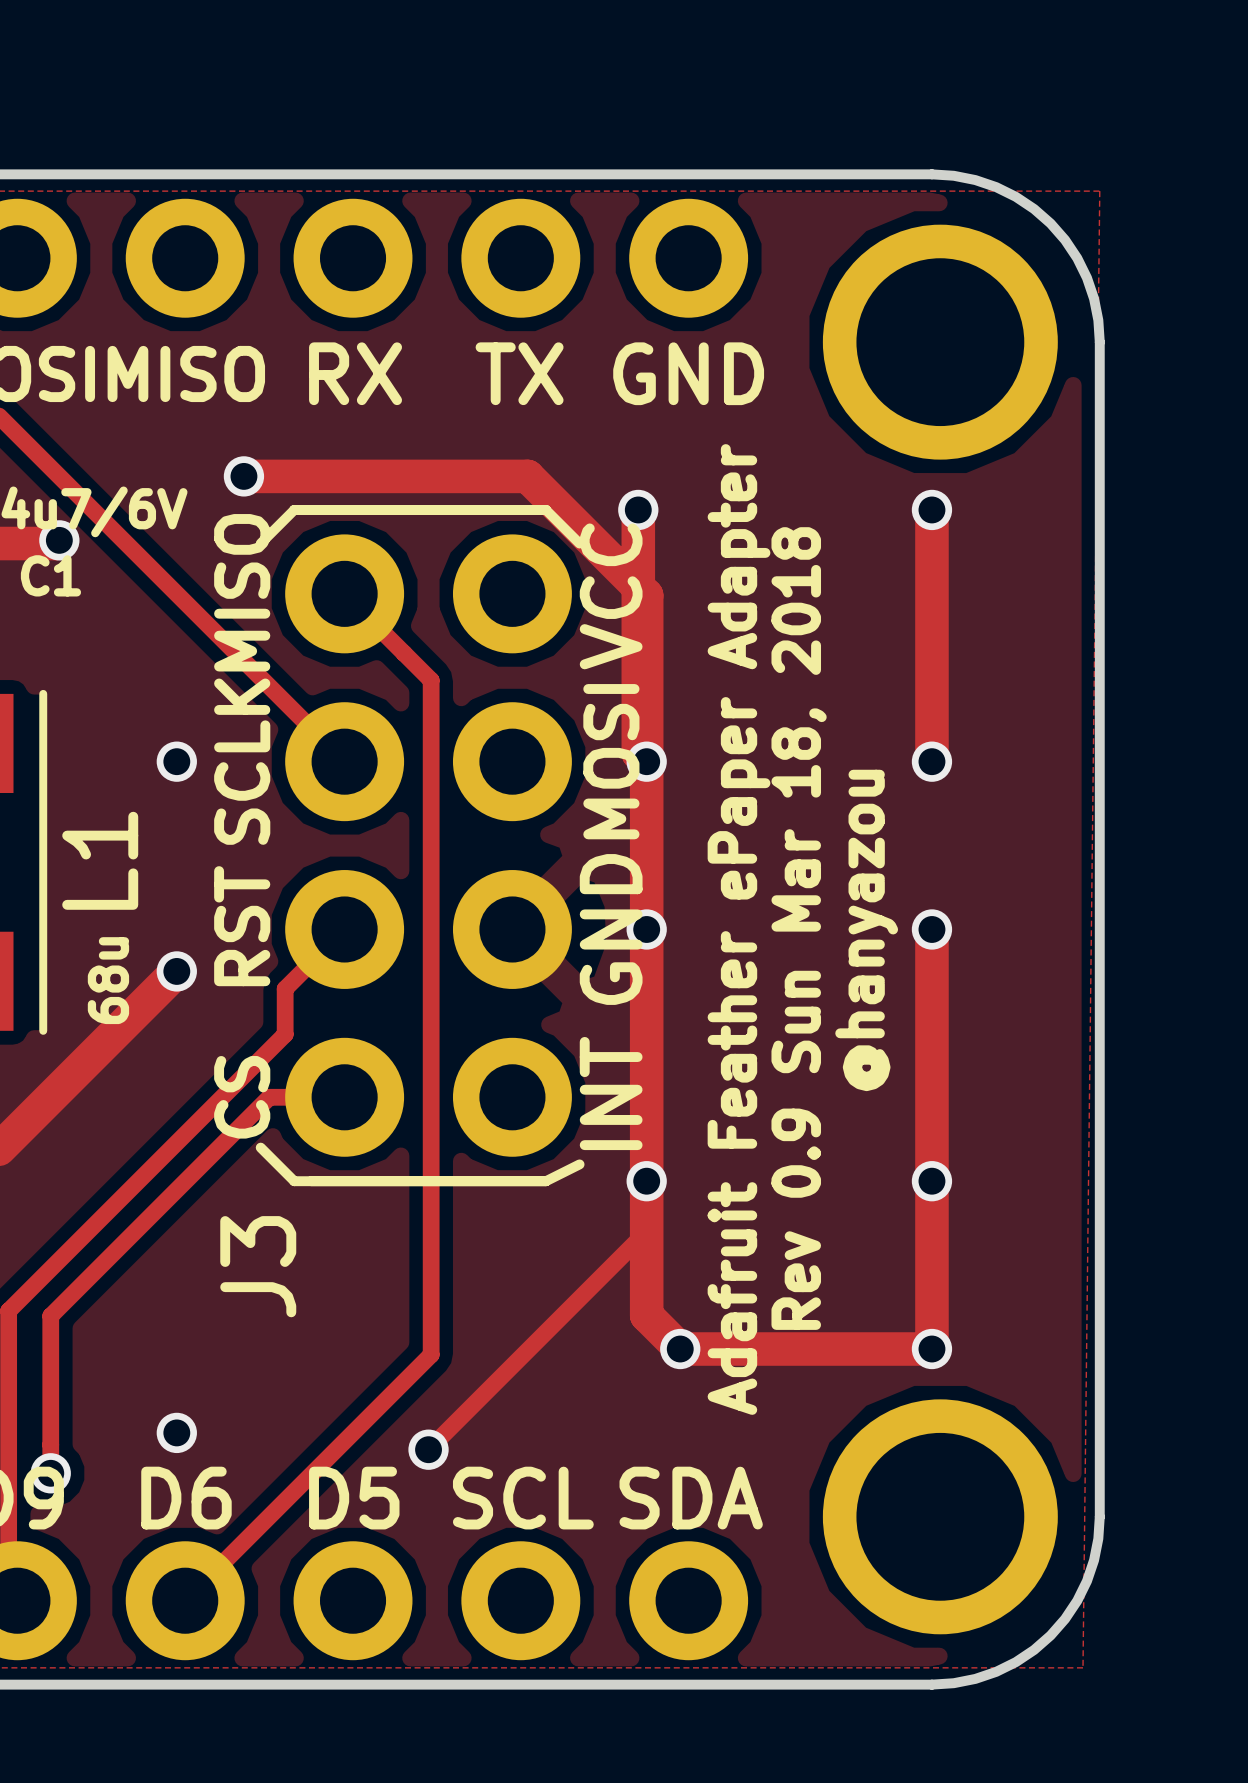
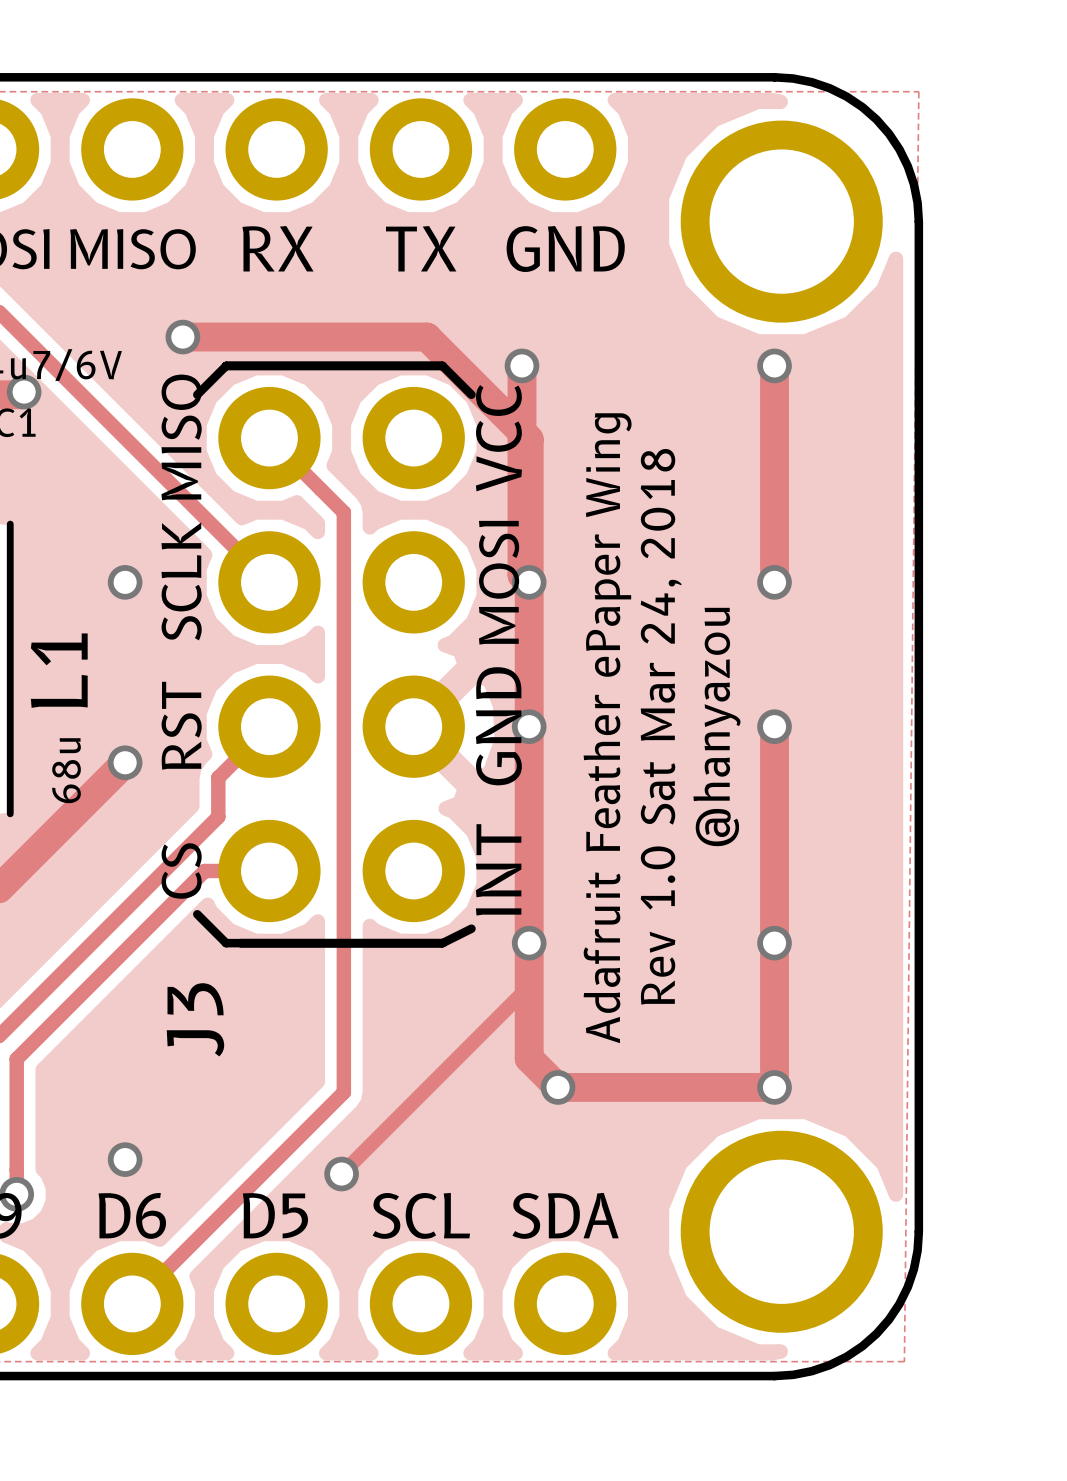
text: Rev 0.9 Sun Mar 18, 2018 (799, 928) -> Rev 1.0 Sat Mar 24, 2018 (661, 726)
text: Adafruit Feather ePaper Adapter (739, 929) -> Adafruit Feather ePaper Wing (607, 728)

